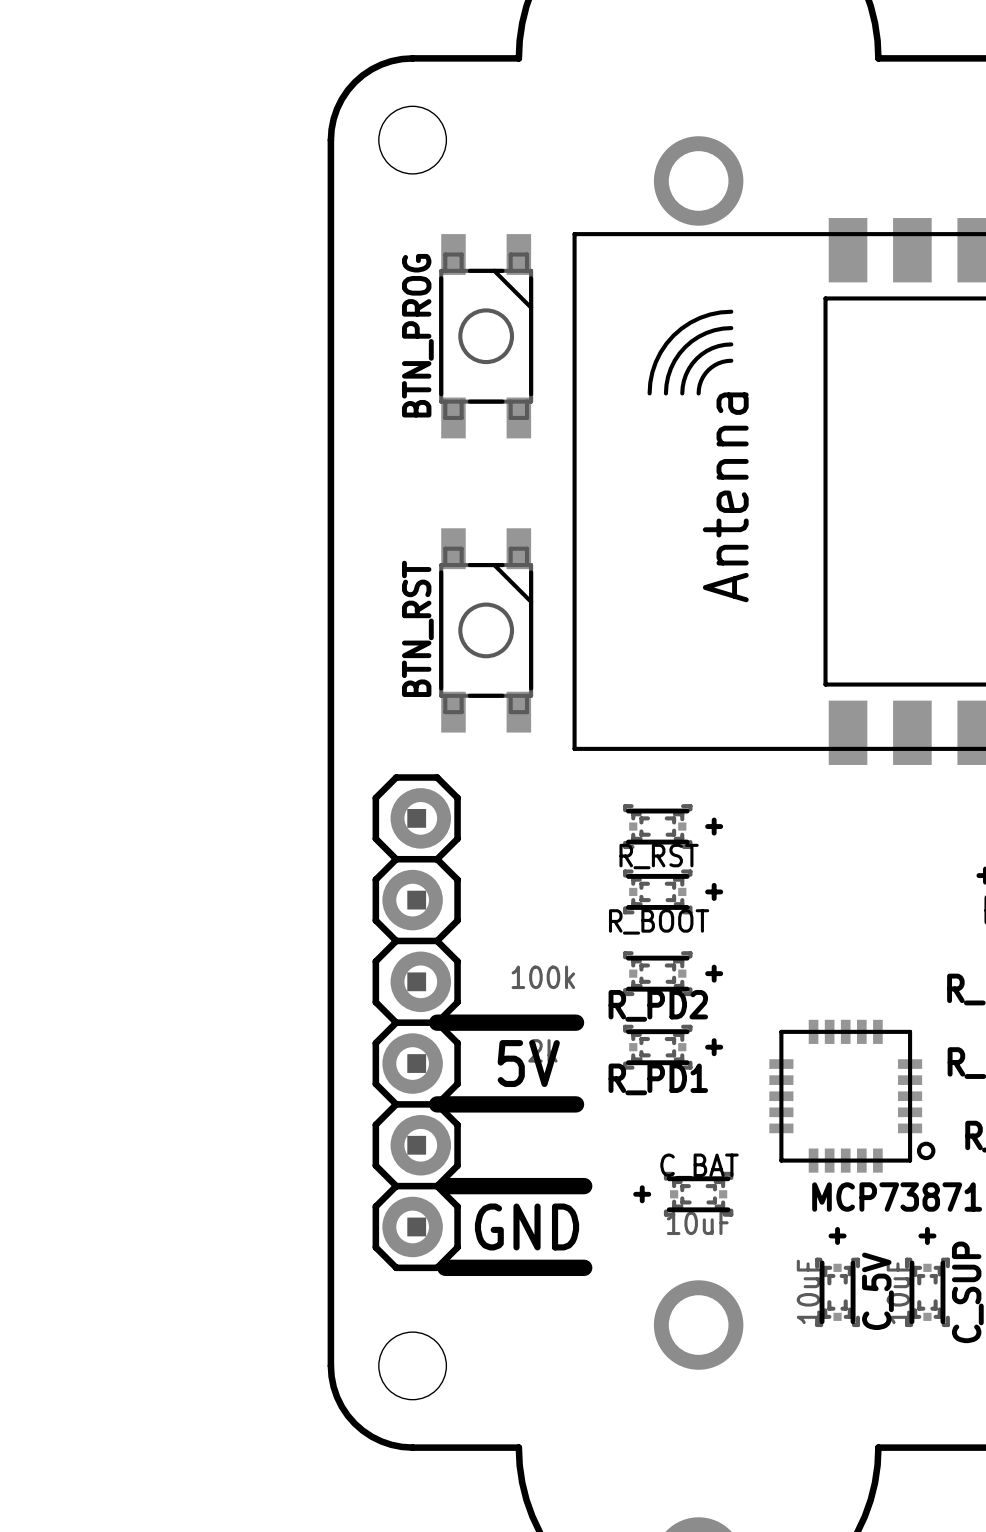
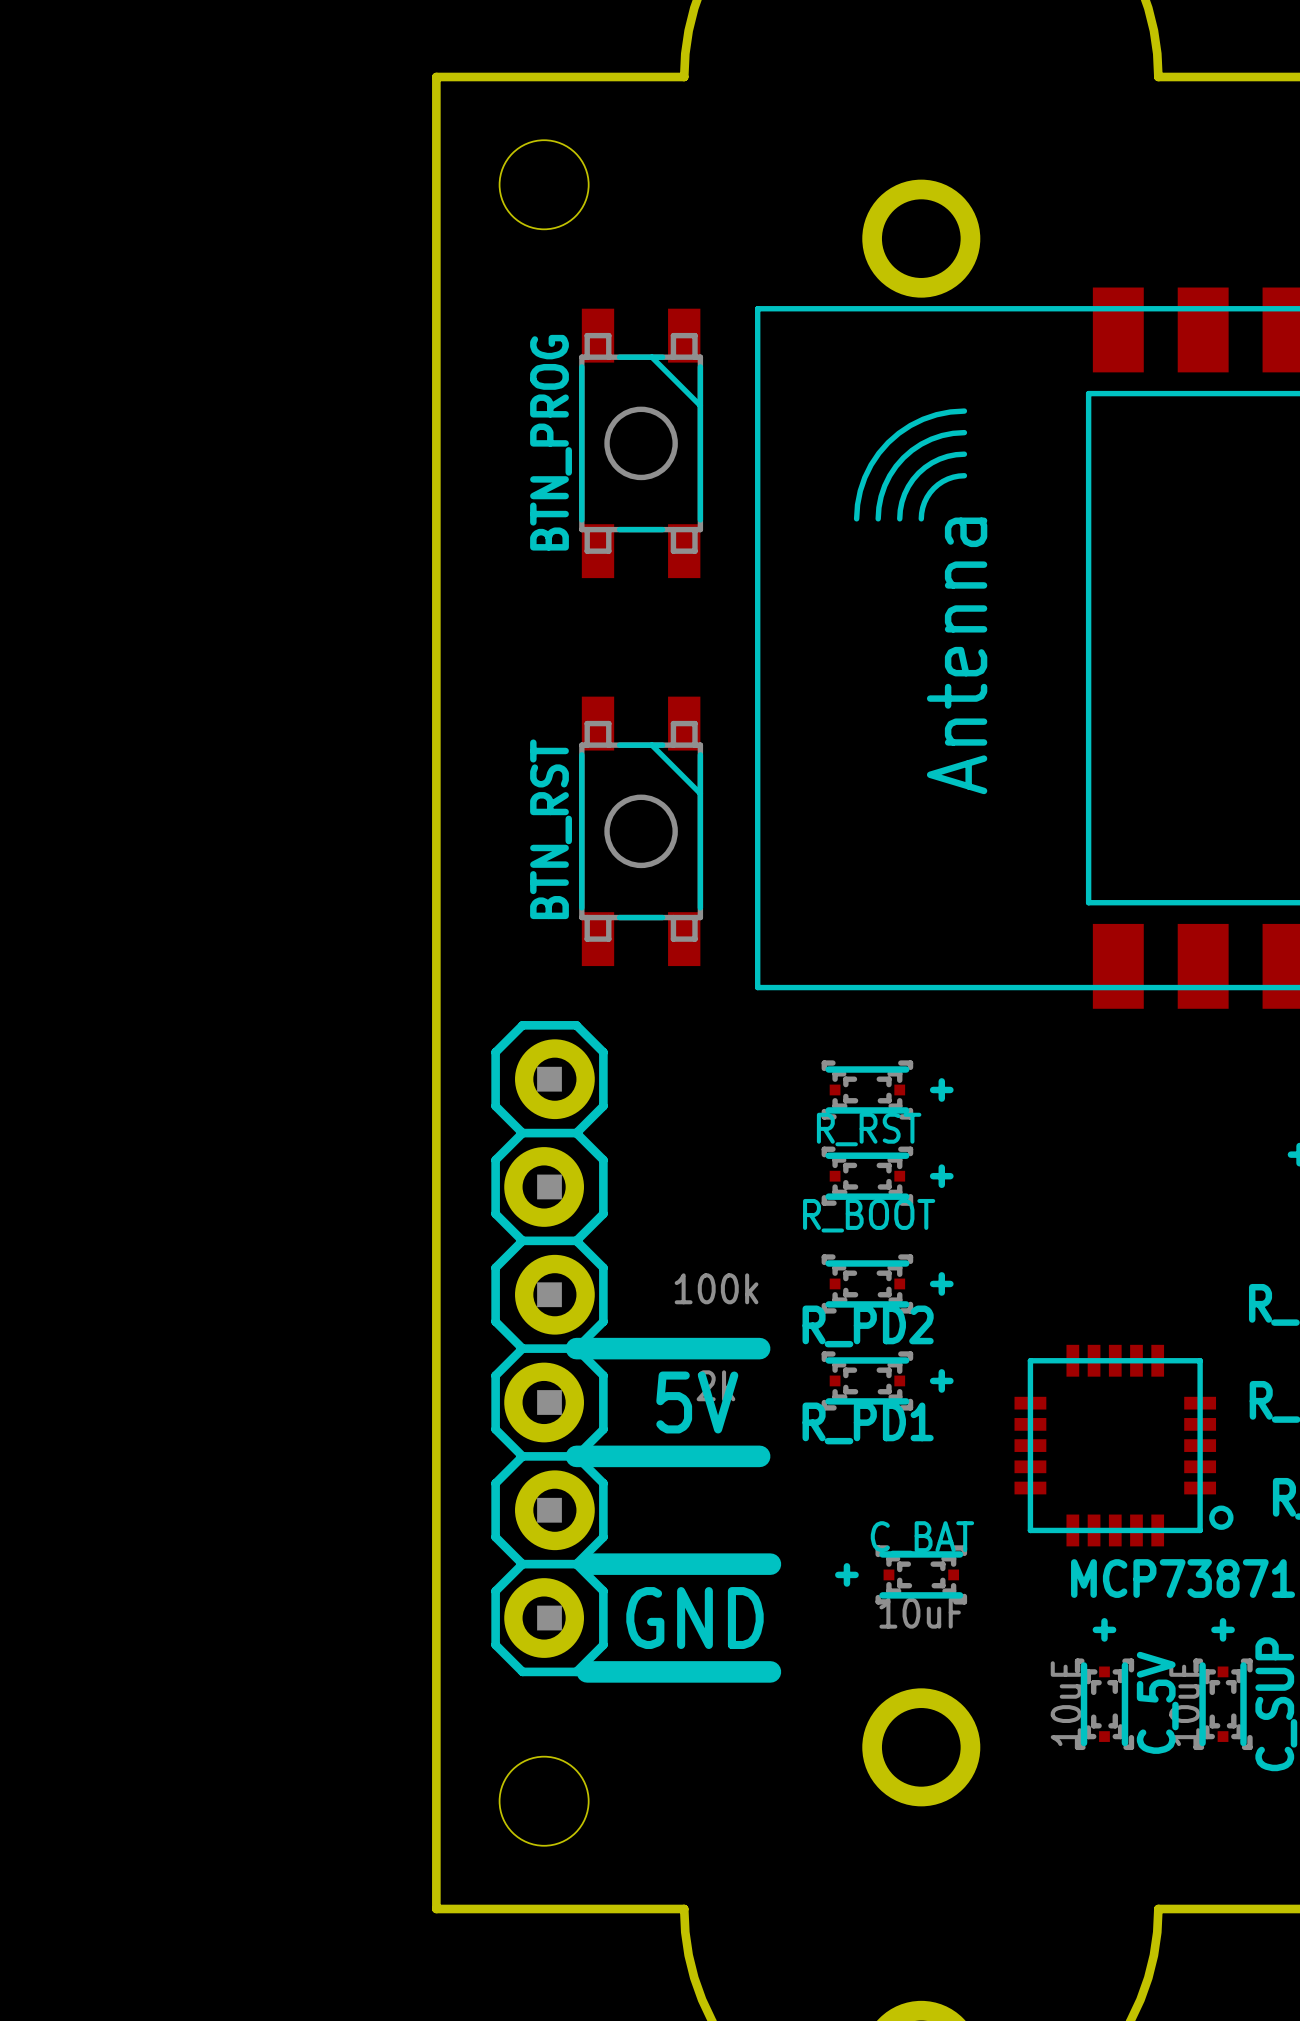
board edge: (412, 58) (381, 64) (354, 82) (337, 108) (330, 140) -> (544, 77) (436, 77) (436, 184)
board edge: (330, 1365) (337, 1397) (354, 1423) (381, 1441) (412, 1447) -> (436, 1801) (436, 1908) (544, 1908)

